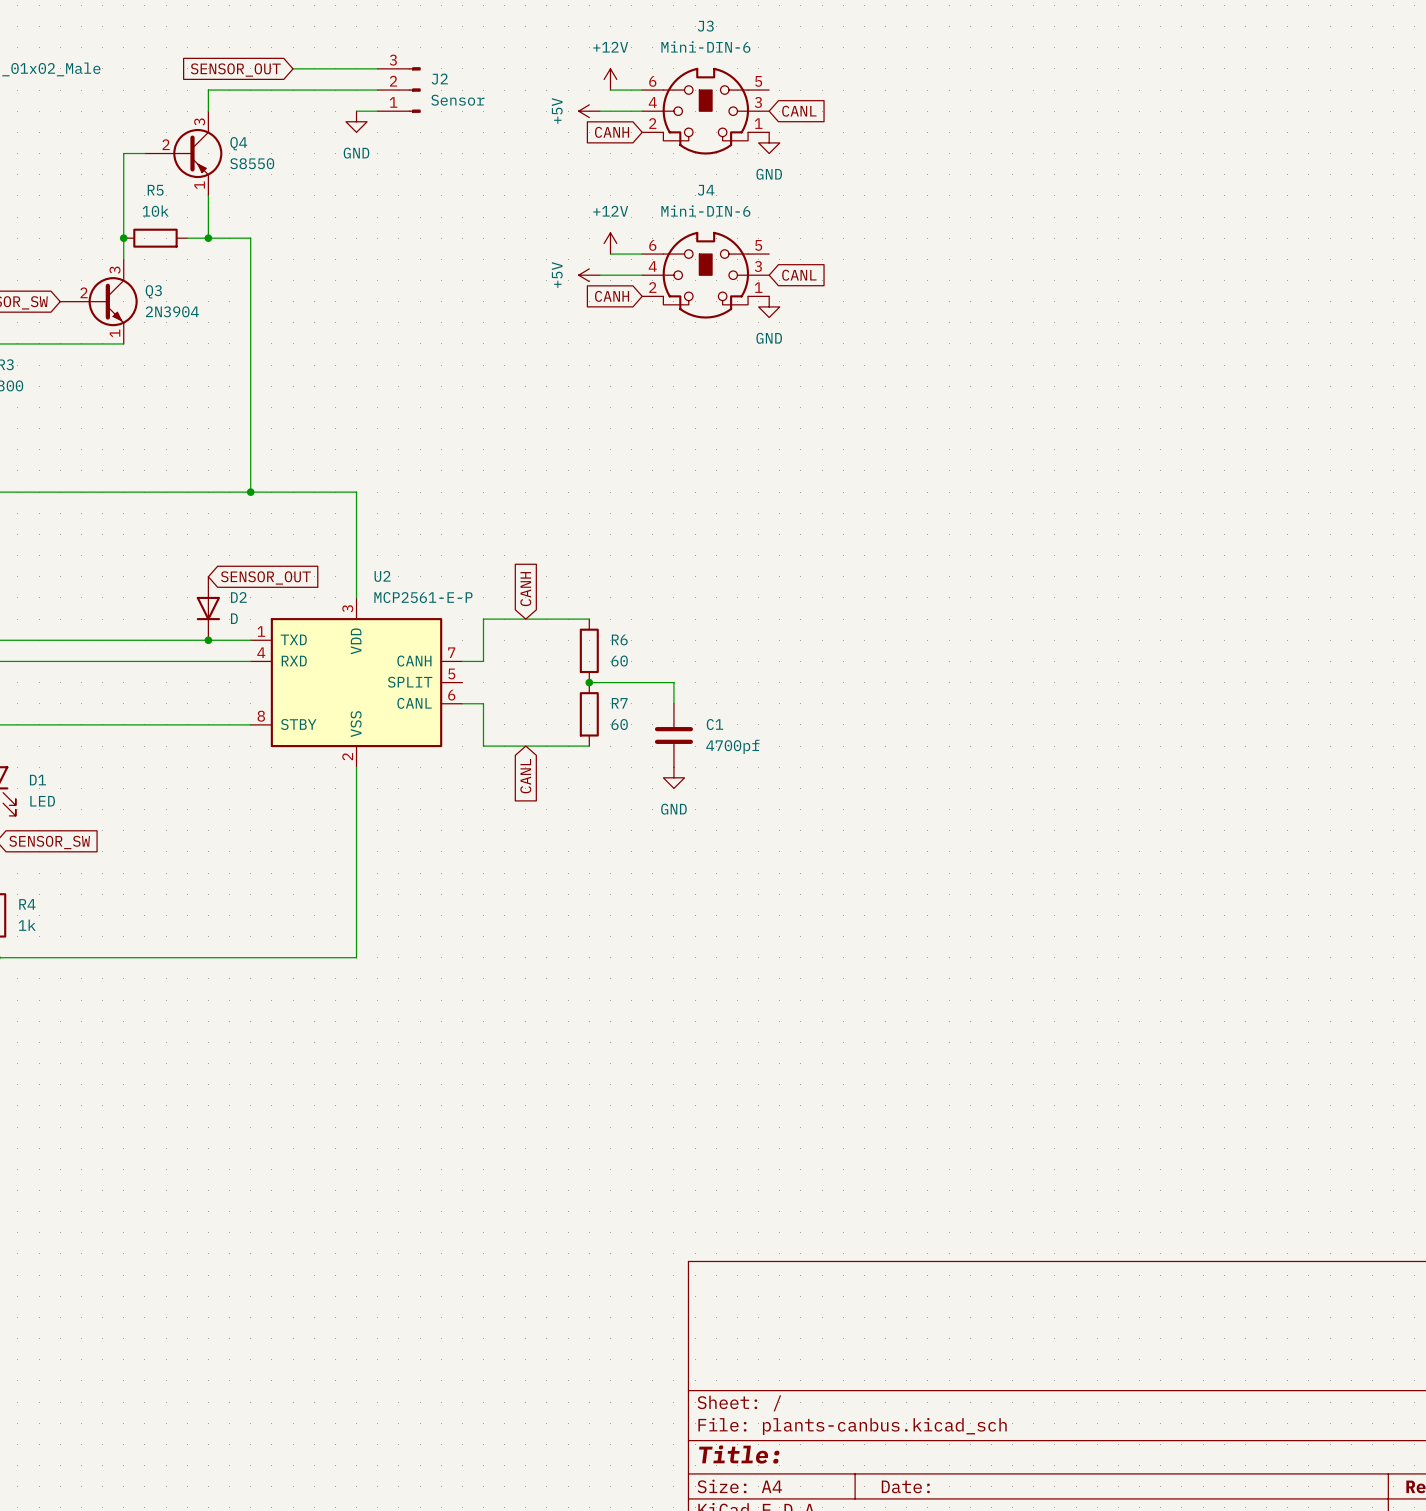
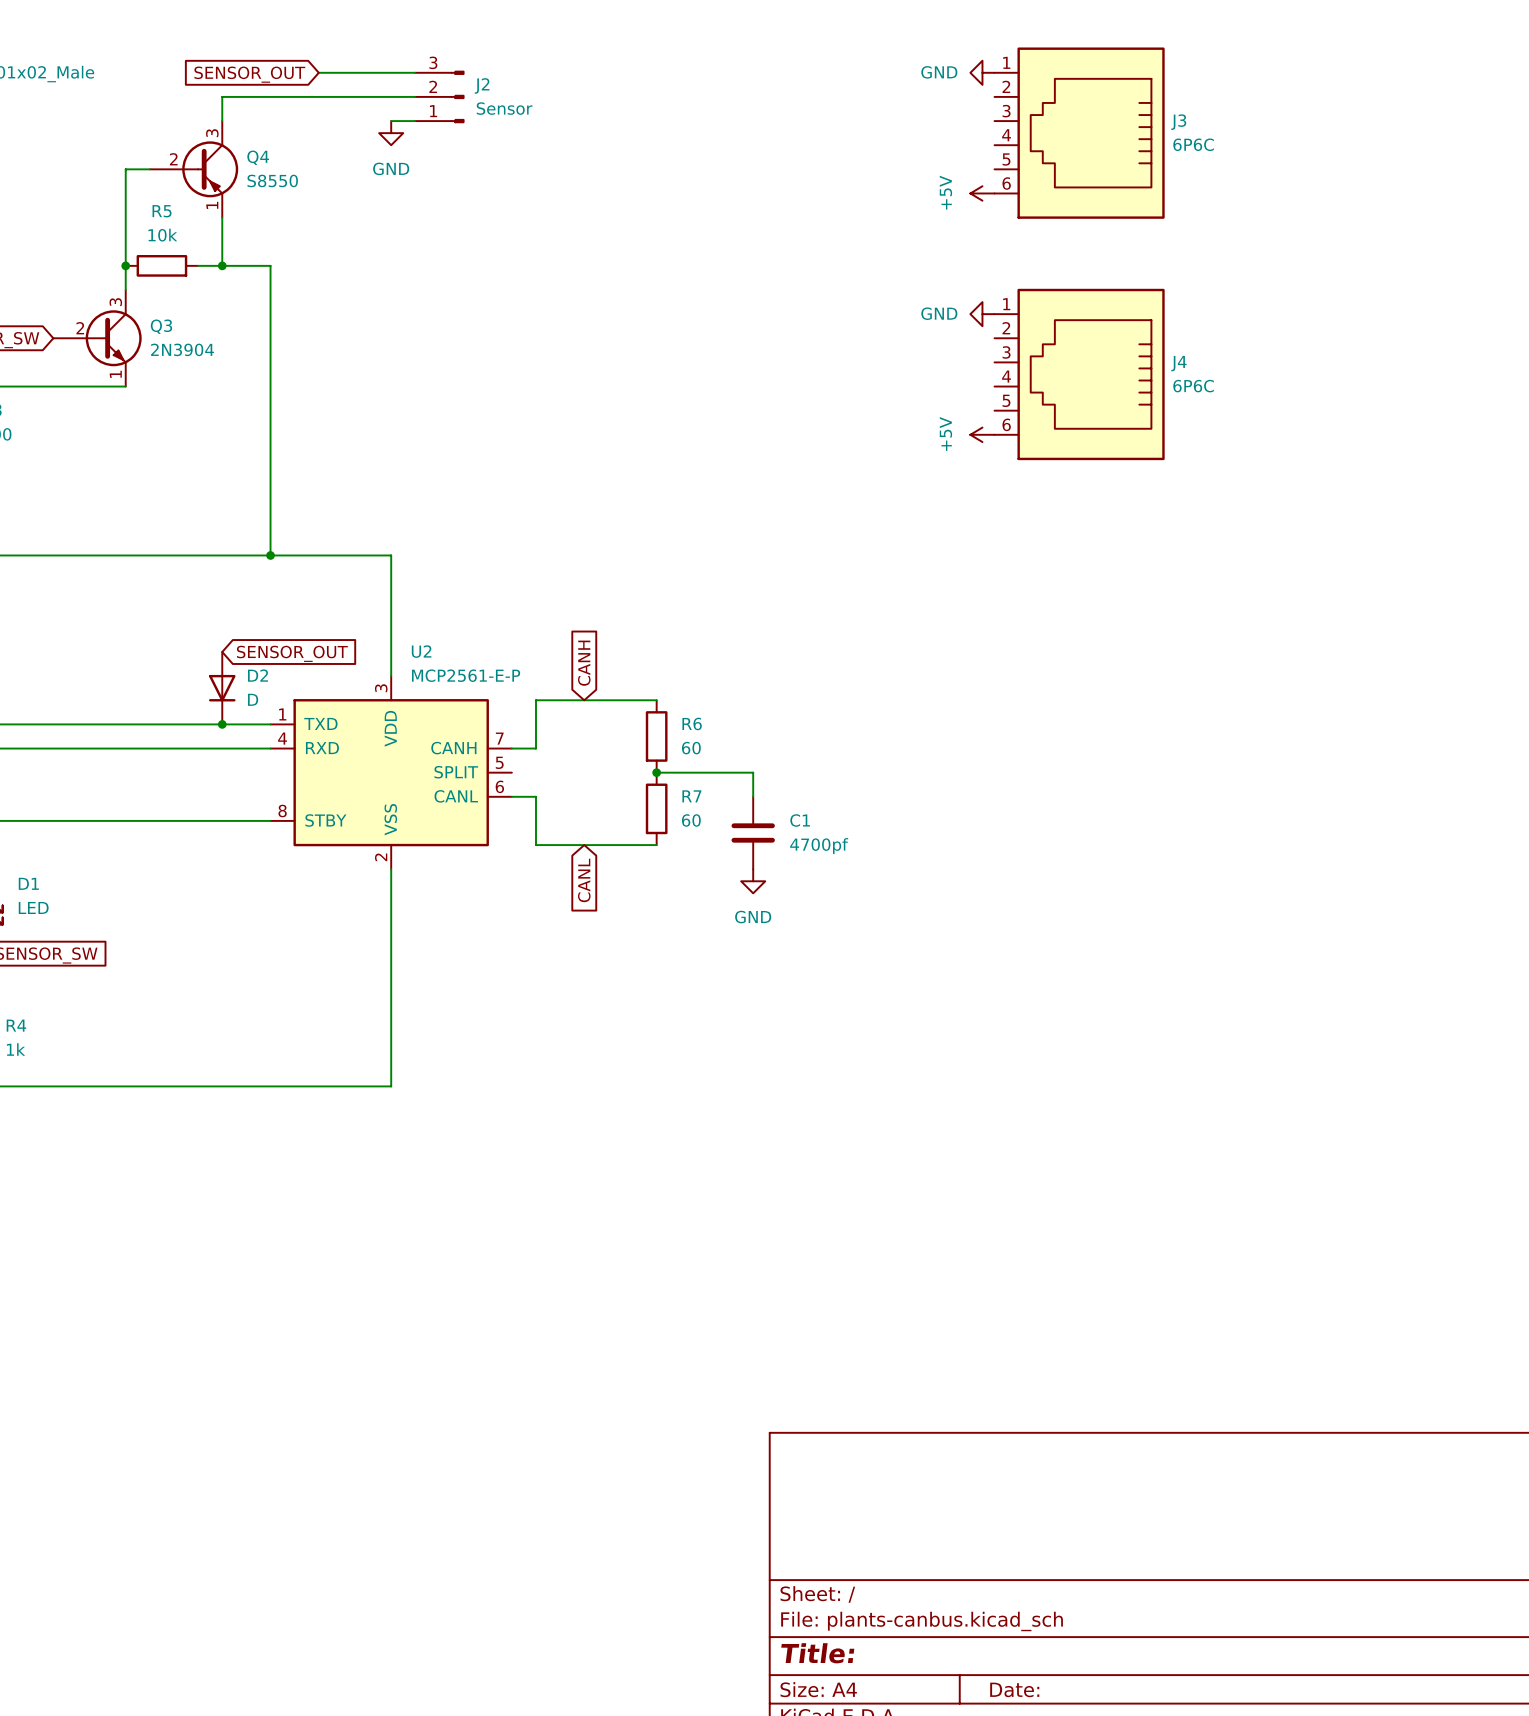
J3 name position: J3 (705, 26) -> J3 (1178, 122)
J3 value: Mini-DIN-6 (705, 47) -> 6P6C (1193, 144)
J3 symbol: [642, 67, 770, 155] -> [994, 47, 1165, 219]
power symbol: none -> GND (982, 72)
power symbol: +12V (610, 79) -> none
wire: (610, 90) (642, 90) -> none
power symbol: +5V (589, 111) -> none
wire: (599, 111) (642, 111) -> none
global label: CANL (799, 111) -> none
global label: CANH (612, 132) -> none
power symbol: GND (769, 142) -> none
power symbol: none -> +5V (982, 193)
J4 name position: J4 (706, 190) -> J4 (1178, 363)
J4 value: Mini-DIN-6 (705, 211) -> 6P6C (1193, 386)
J4 symbol: [642, 231, 770, 319] -> [994, 288, 1165, 461]
power symbol: +12V (610, 243) -> none
wire: (610, 254) (642, 254) -> none
power symbol: +5V (589, 275) -> none
wire: (599, 275) (642, 275) -> none
global label: CANL (799, 275) -> none
power symbol: none -> GND (982, 314)
global label: CANH (612, 296) -> none
power symbol: GND (769, 306) -> none
power symbol: none -> +5V (982, 434)

